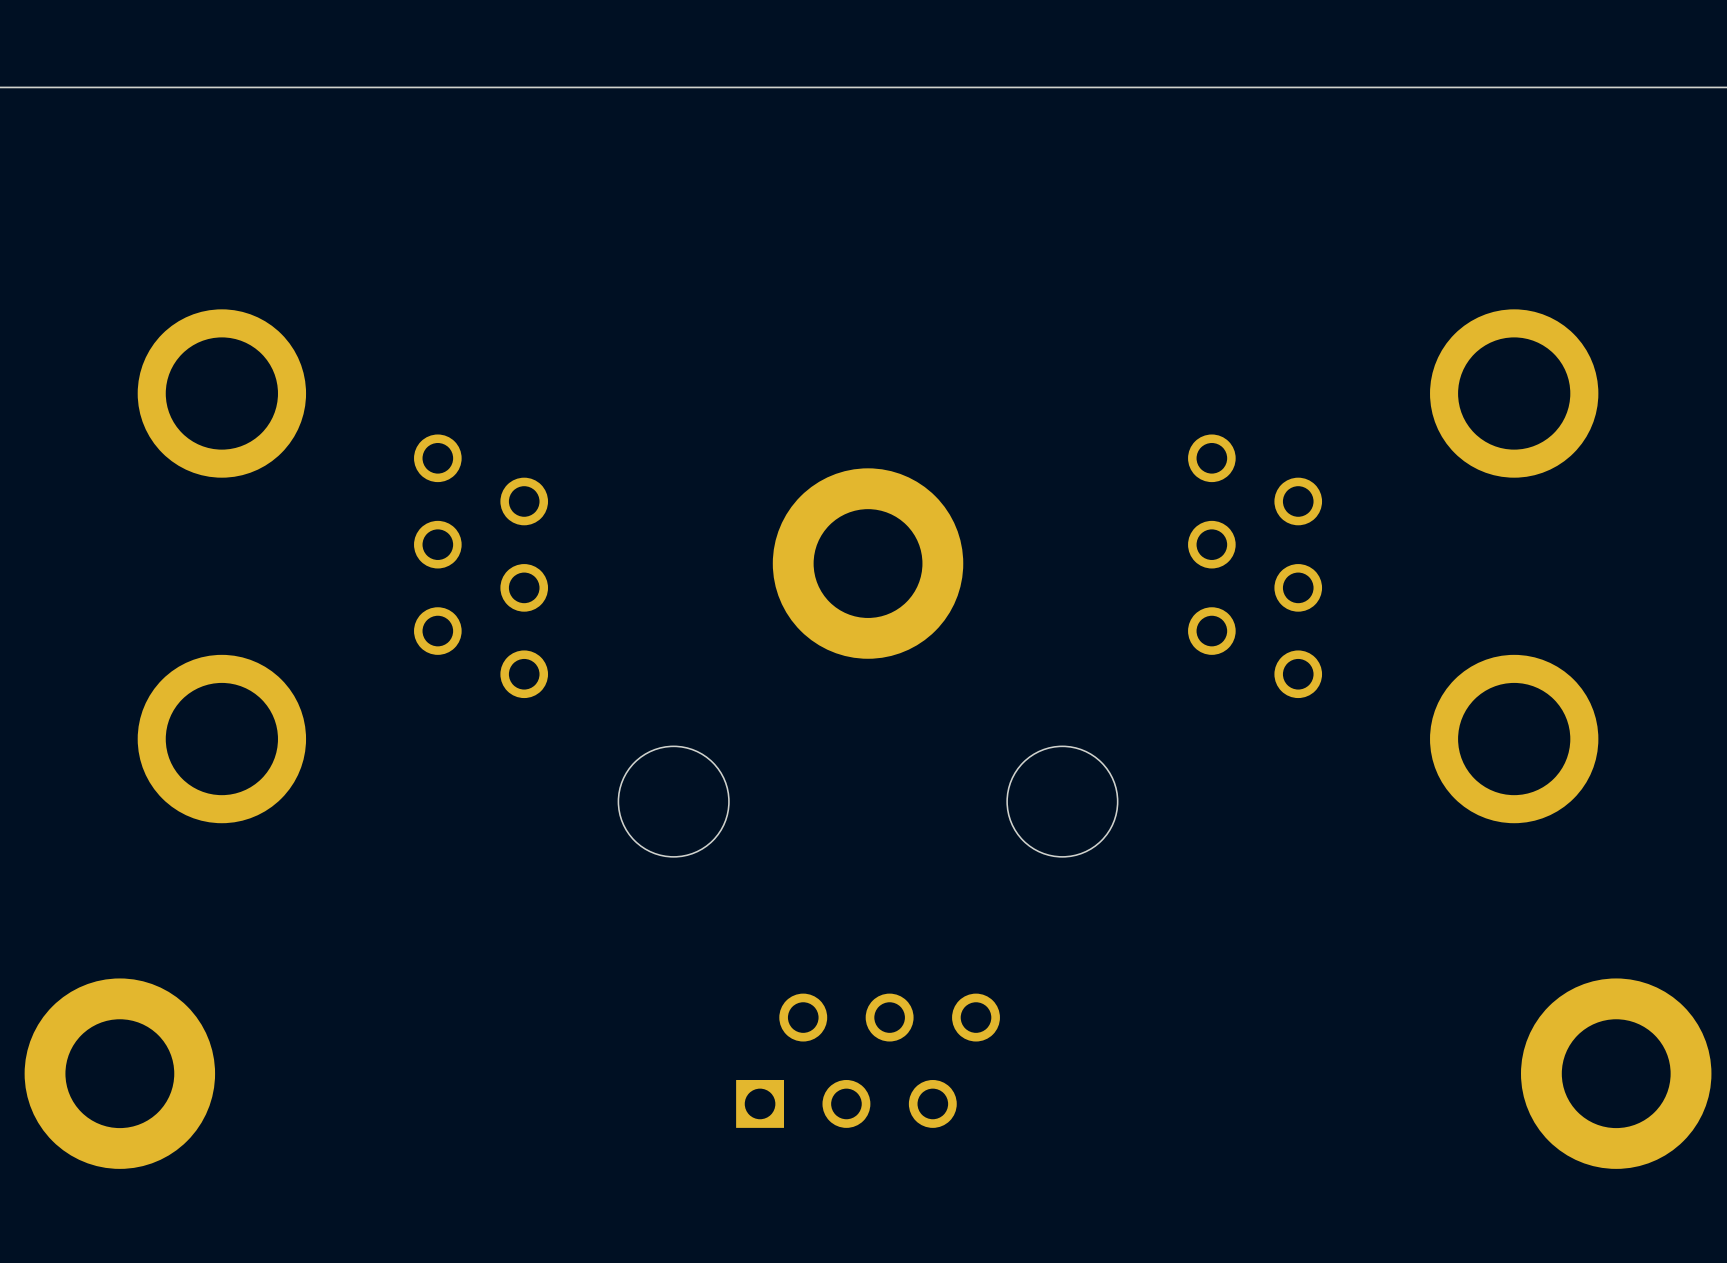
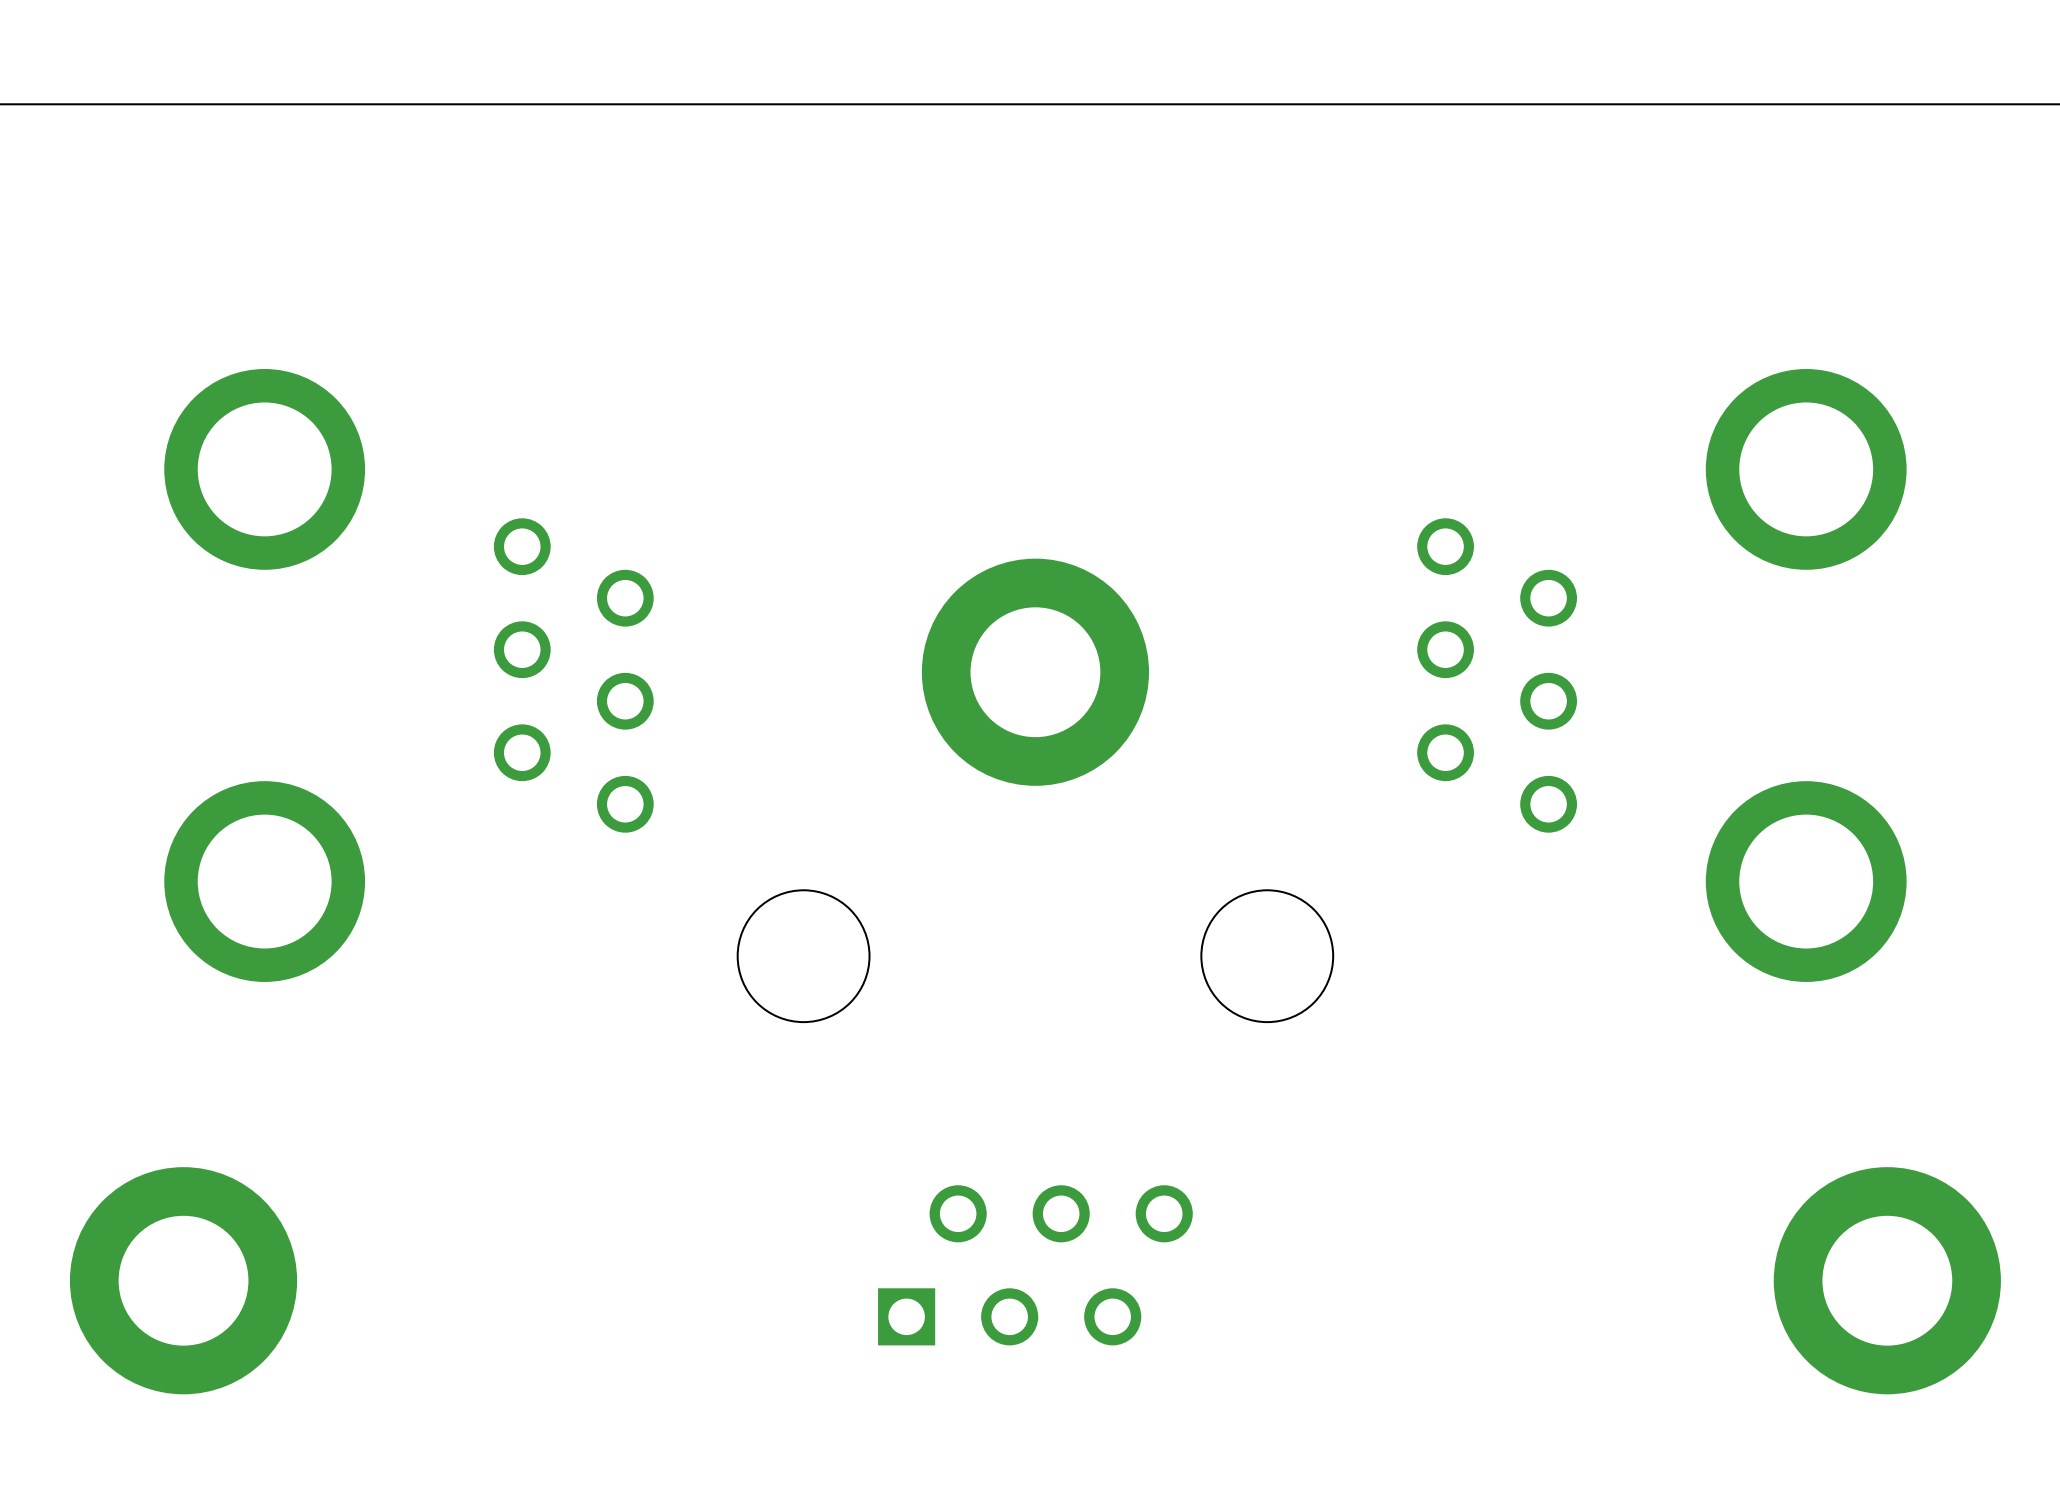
part position: (119, 1073) -> (183, 1280)
part position: (1616, 1073) -> (1887, 1280)

